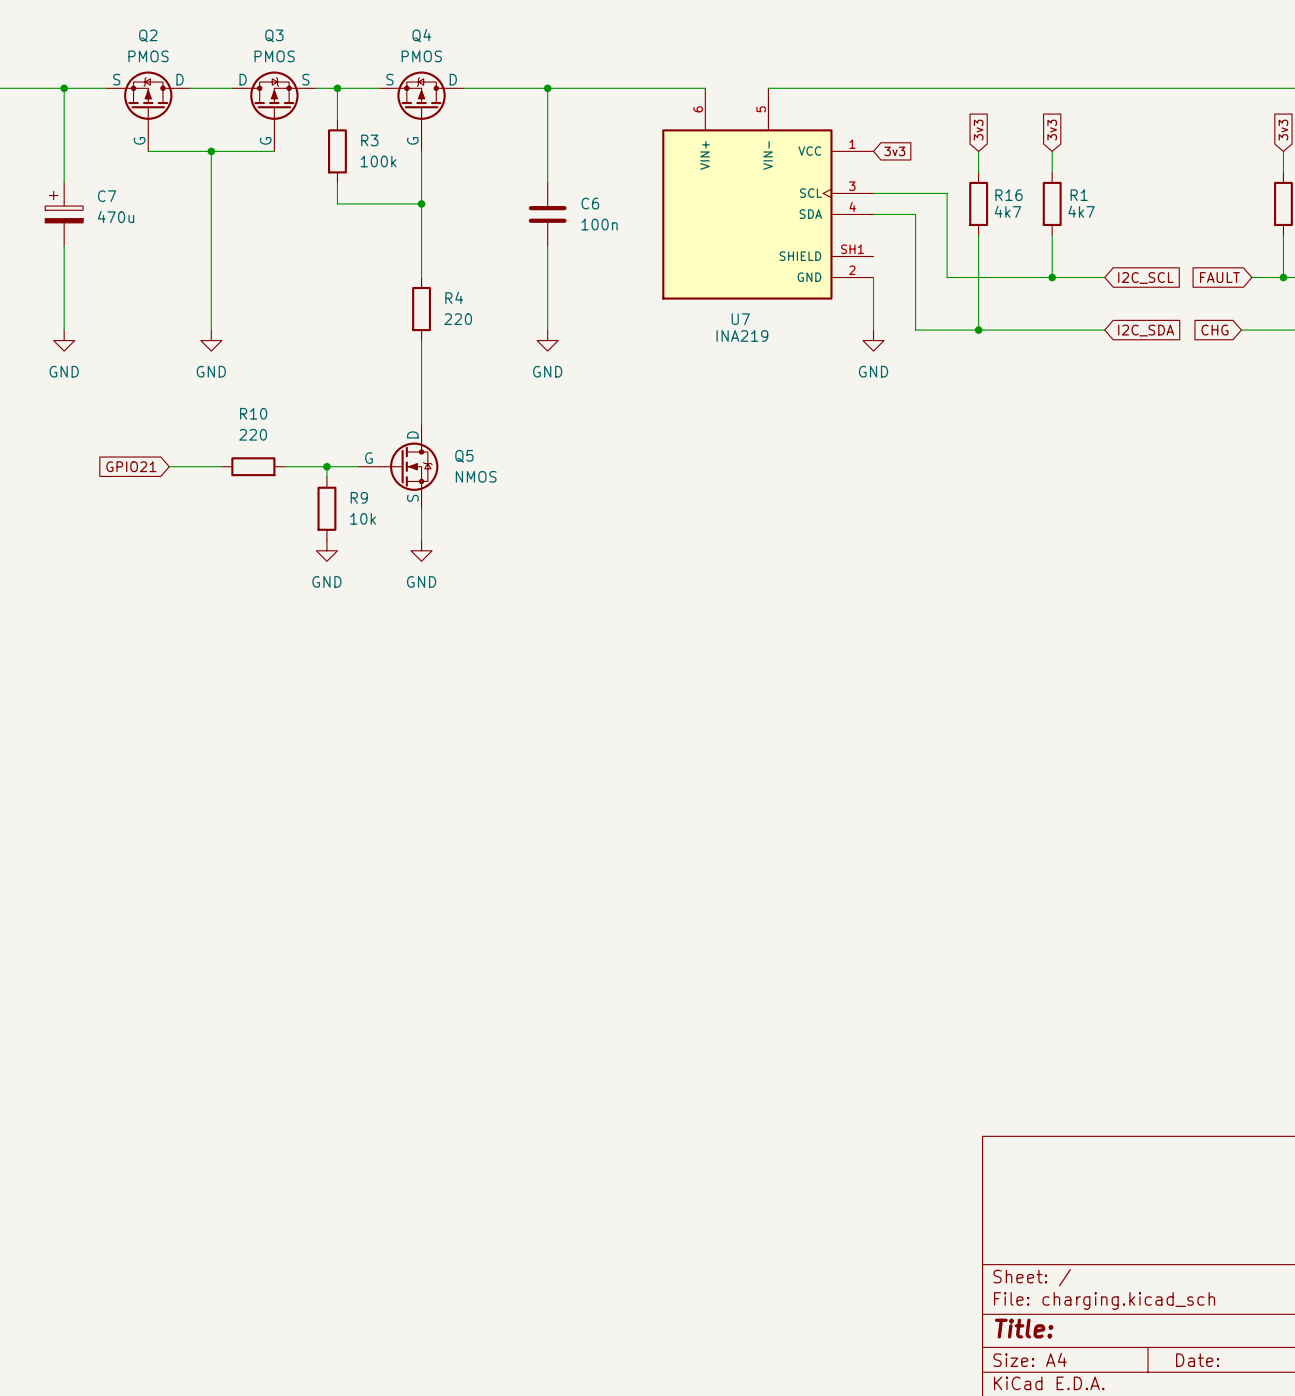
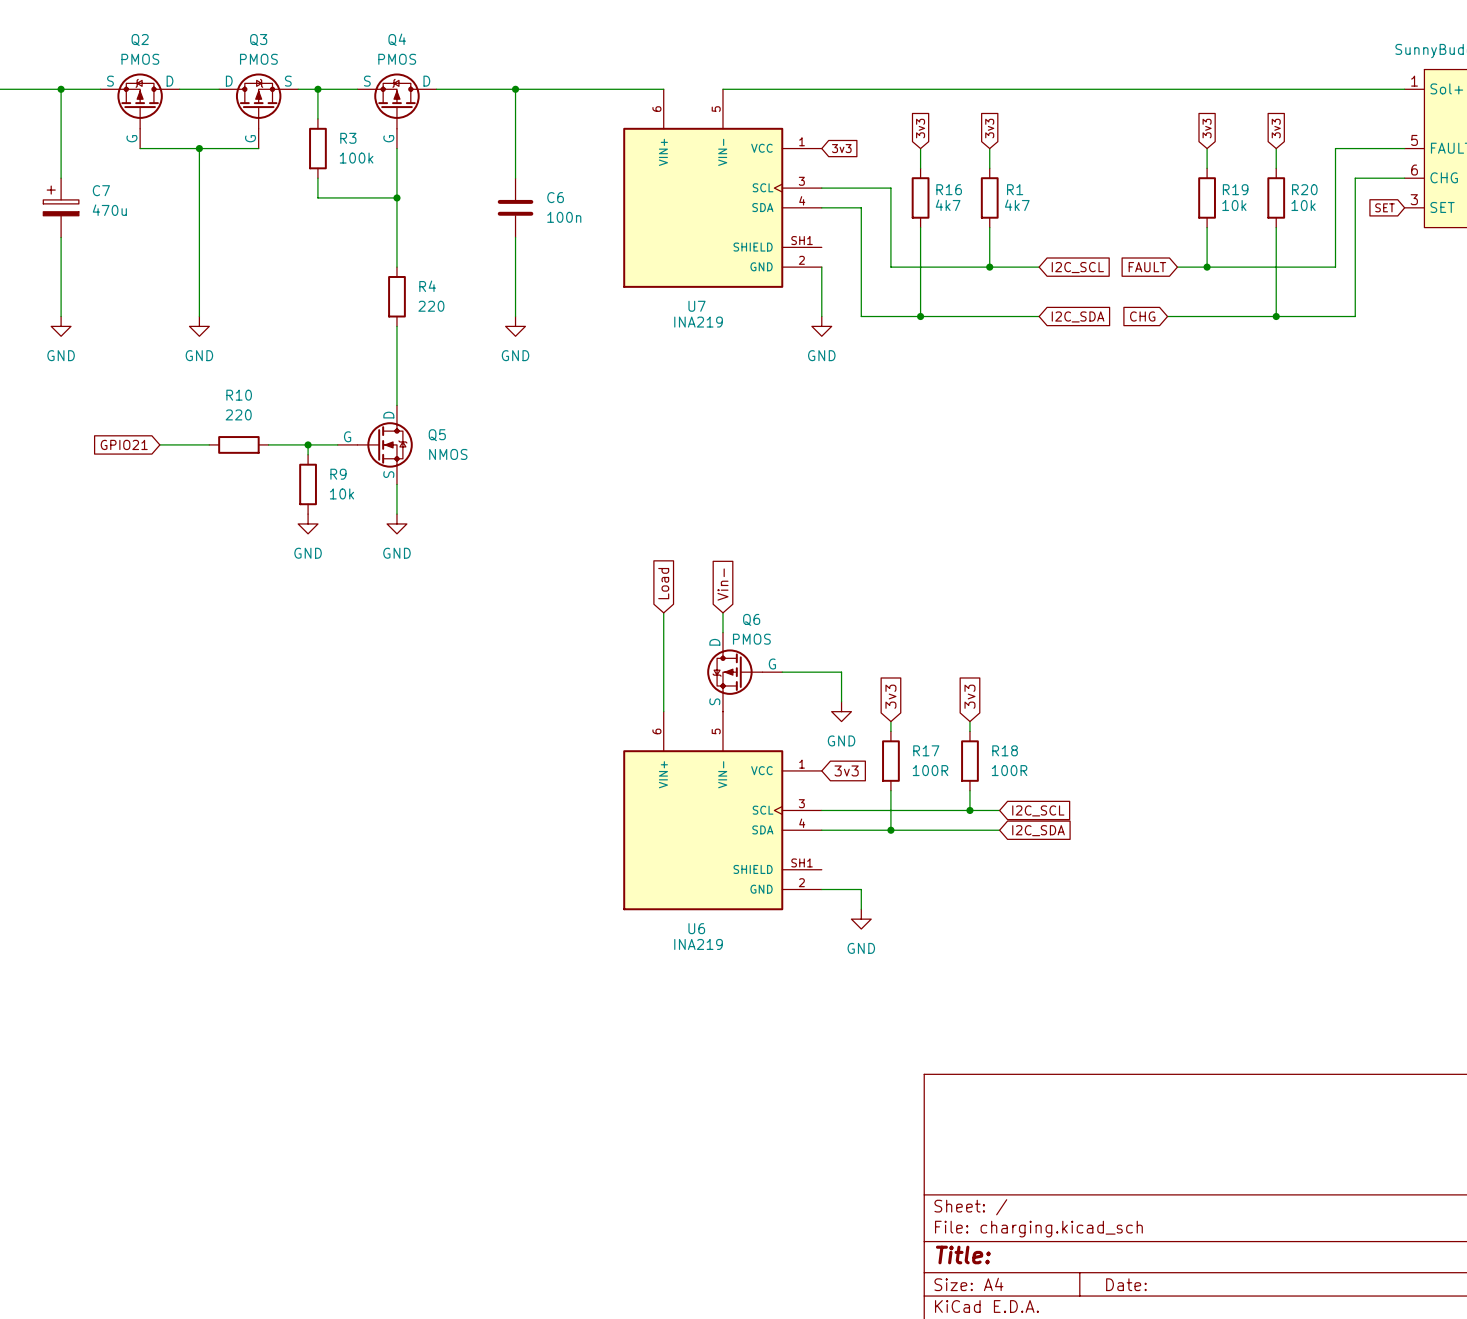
global label: none -> Load (663, 583)
global label: none -> Vin- (722, 584)
wire: none -> (663, 612) (663, 711)
wire: none -> (722, 612) (722, 632)
Q6: none -> PMOS (744, 672)
wire: none -> (782, 672) (841, 672) (841, 701)
global label: none -> 3v3 (890, 696)
global label: none -> 3v3 (969, 696)
power symbol: none -> GND (841, 711)
wire: none -> (890, 721) (890, 731)
wire: none -> (969, 721) (969, 731)
R17: none -> 100R (890, 761)
R18: none -> 100R (969, 761)
global label: none -> 3v3 (846, 770)
wire: none -> (890, 790) (890, 830)
wire: none -> (969, 790) (969, 810)
wire: none -> (821, 810) (999, 810)
junction: none -> (969, 810)
U6: none -> INA219 (722, 810)
global label: none -> I2C_SCL (1038, 810)
wire: none -> (821, 830) (999, 830)
junction: none -> (890, 830)
global label: none -> I2C_SDA (1038, 830)
wire: none -> (821, 889) (861, 889) (861, 909)
power symbol: none -> GND (861, 919)

